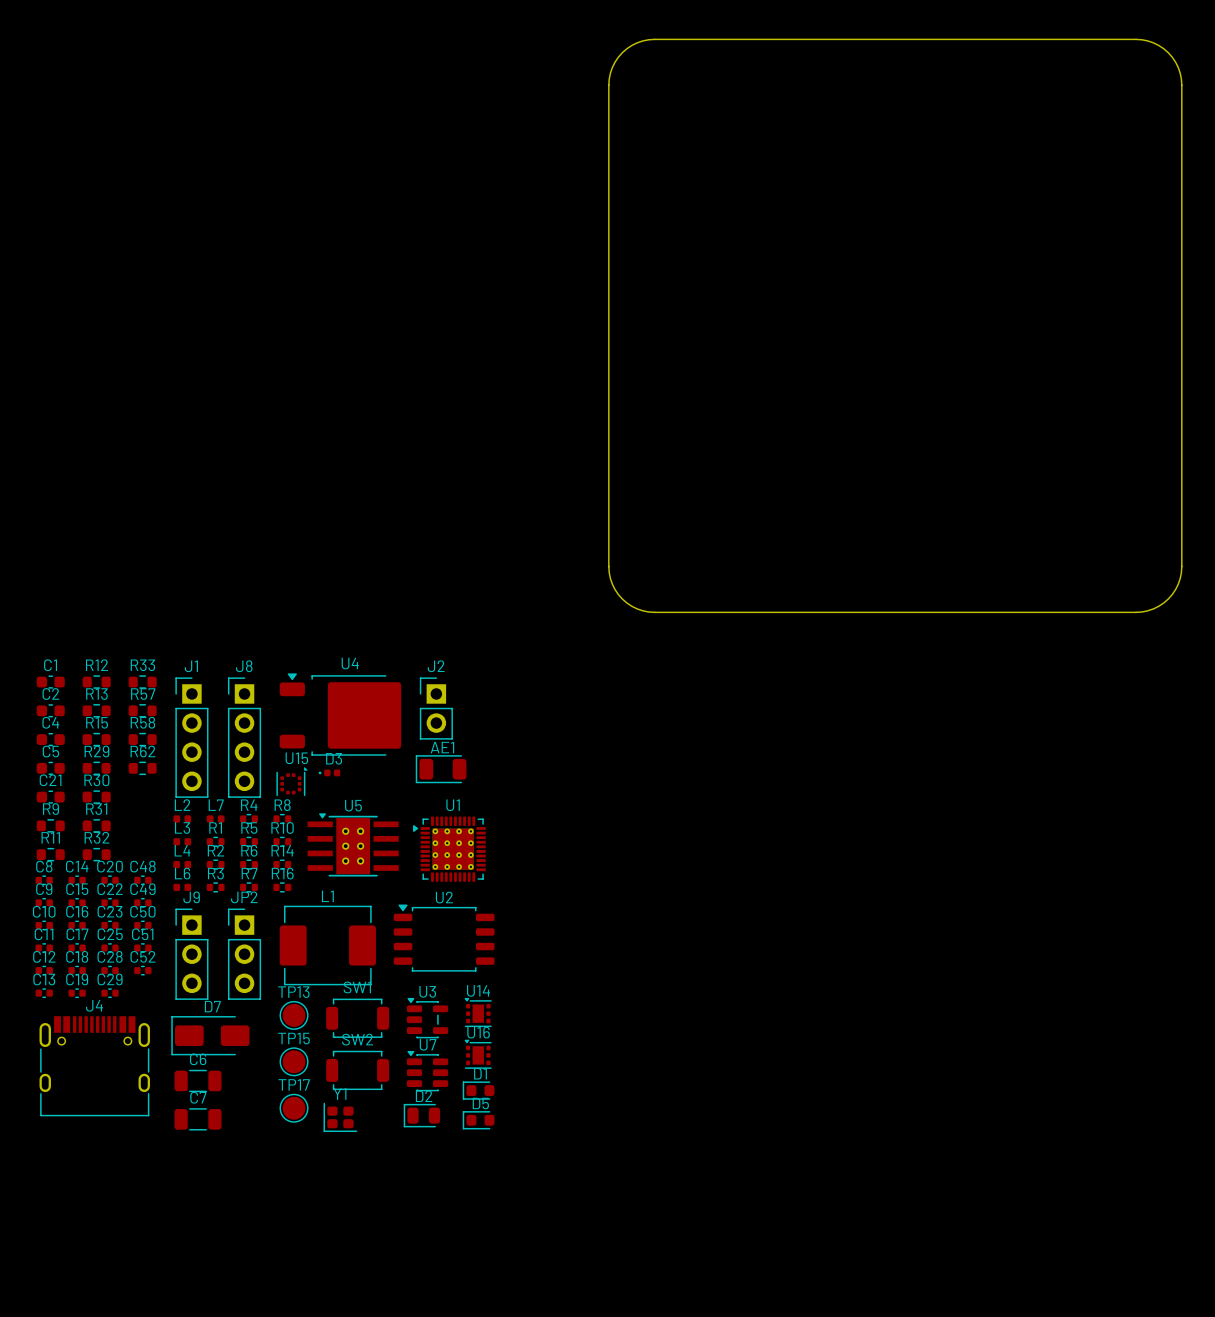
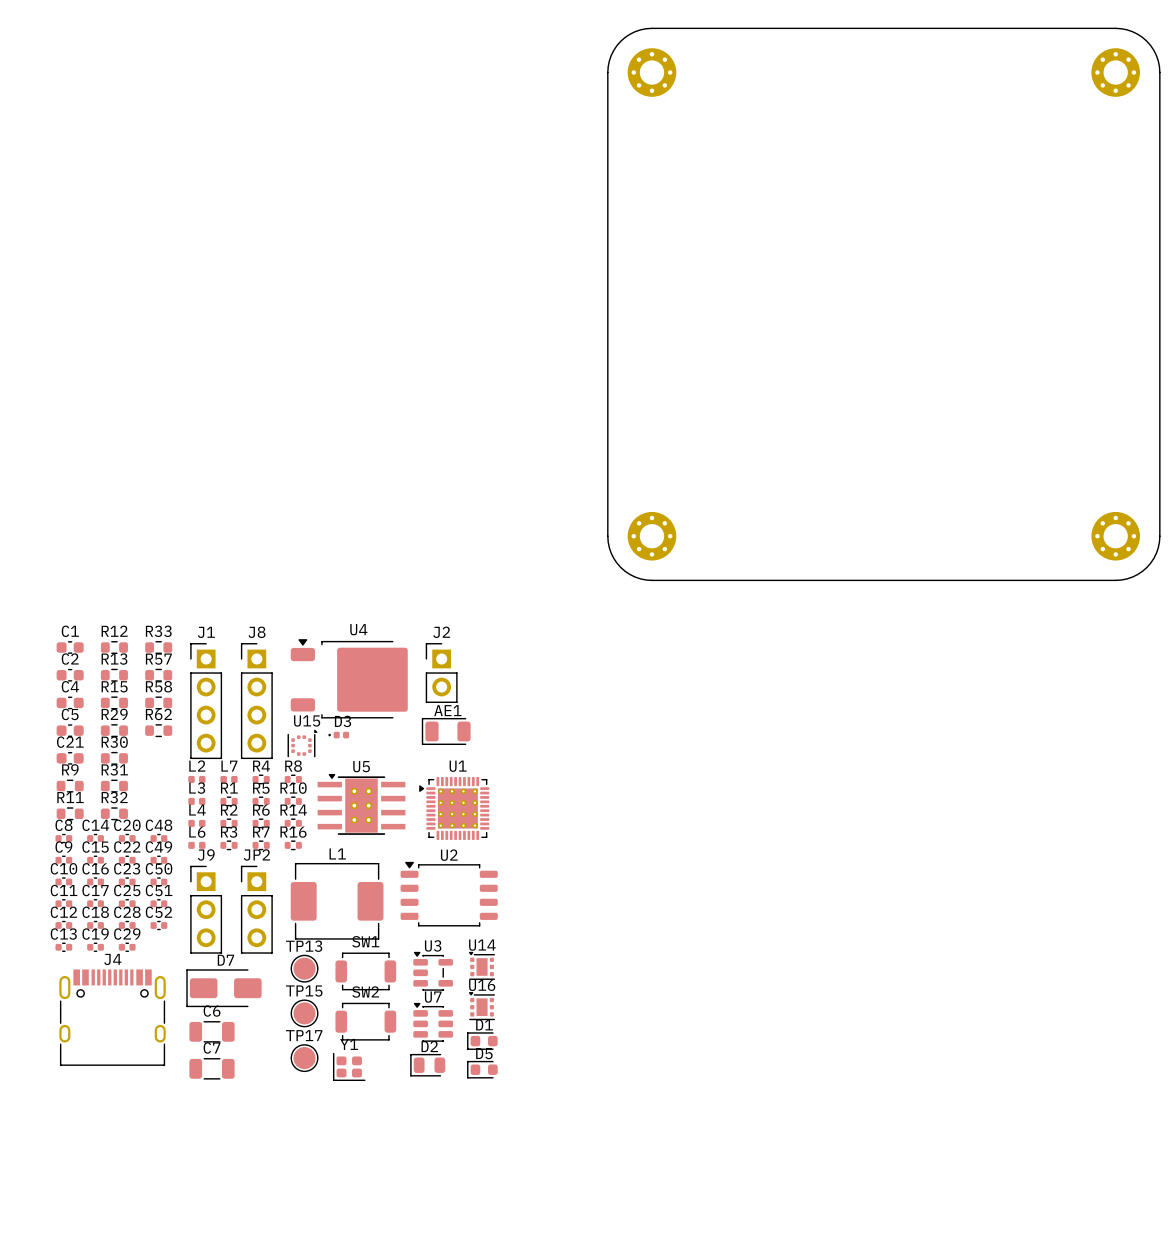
part: none -> (651, 72)
part: none -> (1115, 72)
part: none -> (651, 536)
part: none -> (1115, 536)

